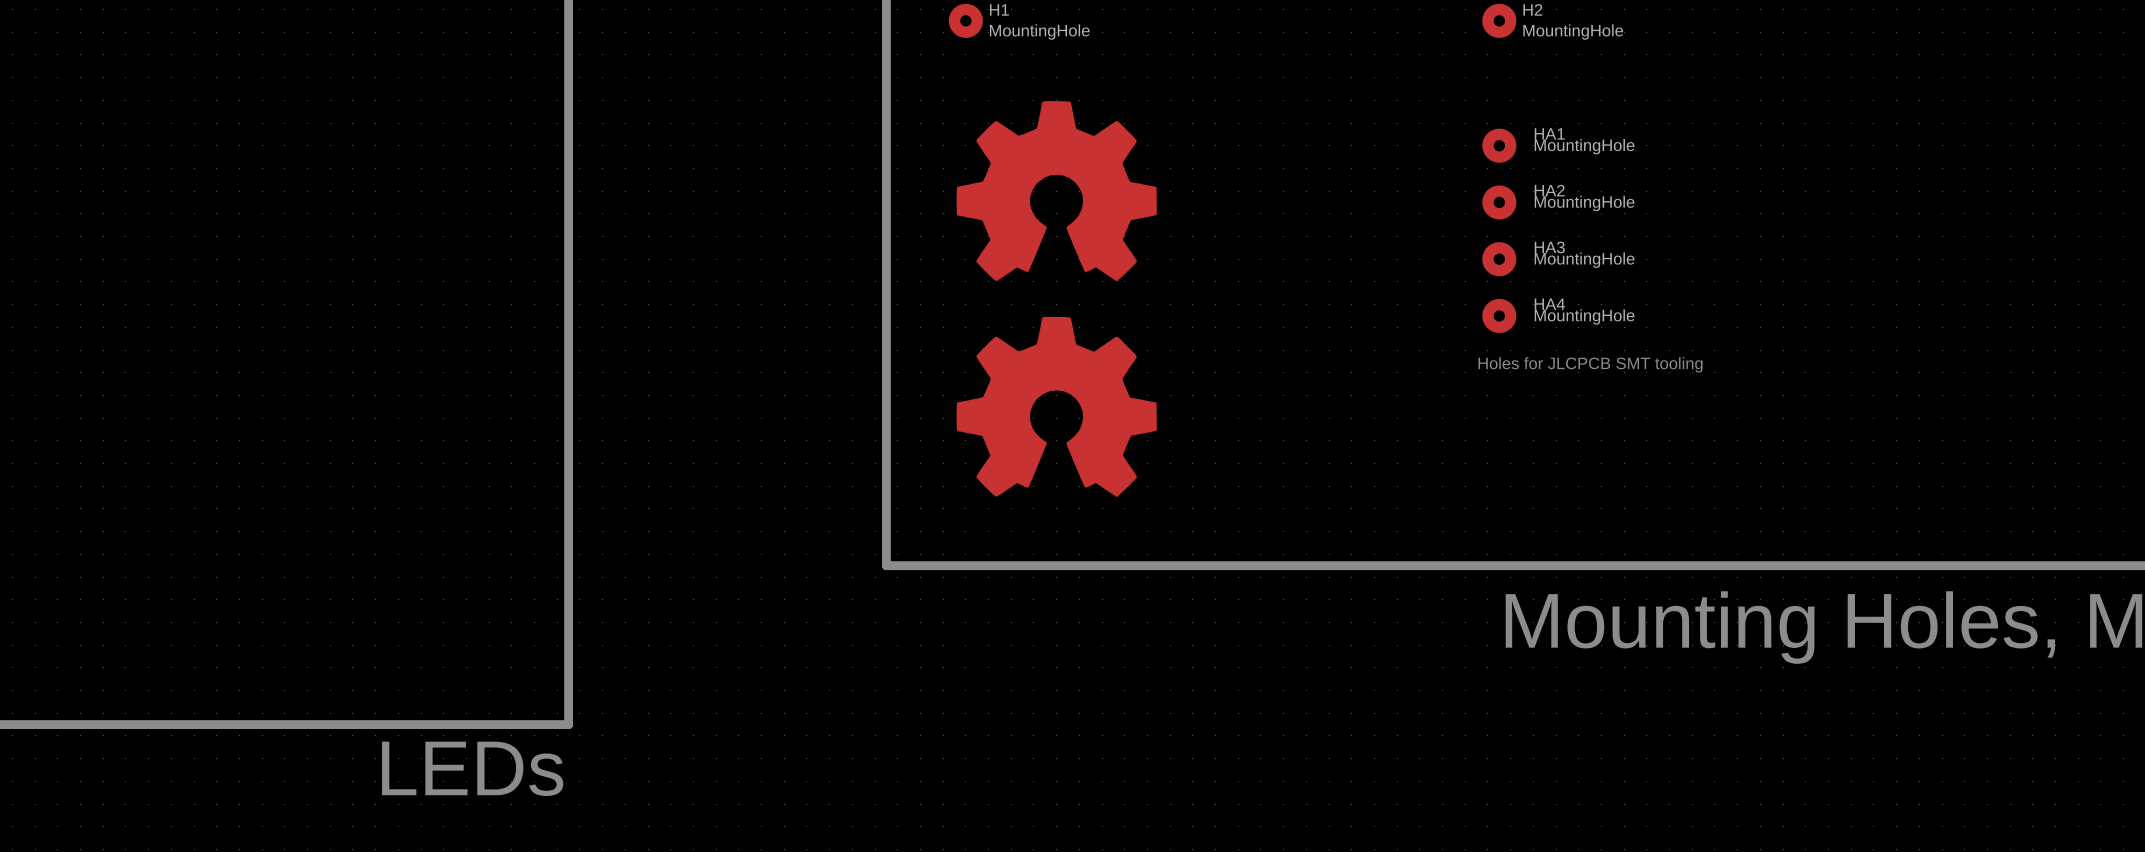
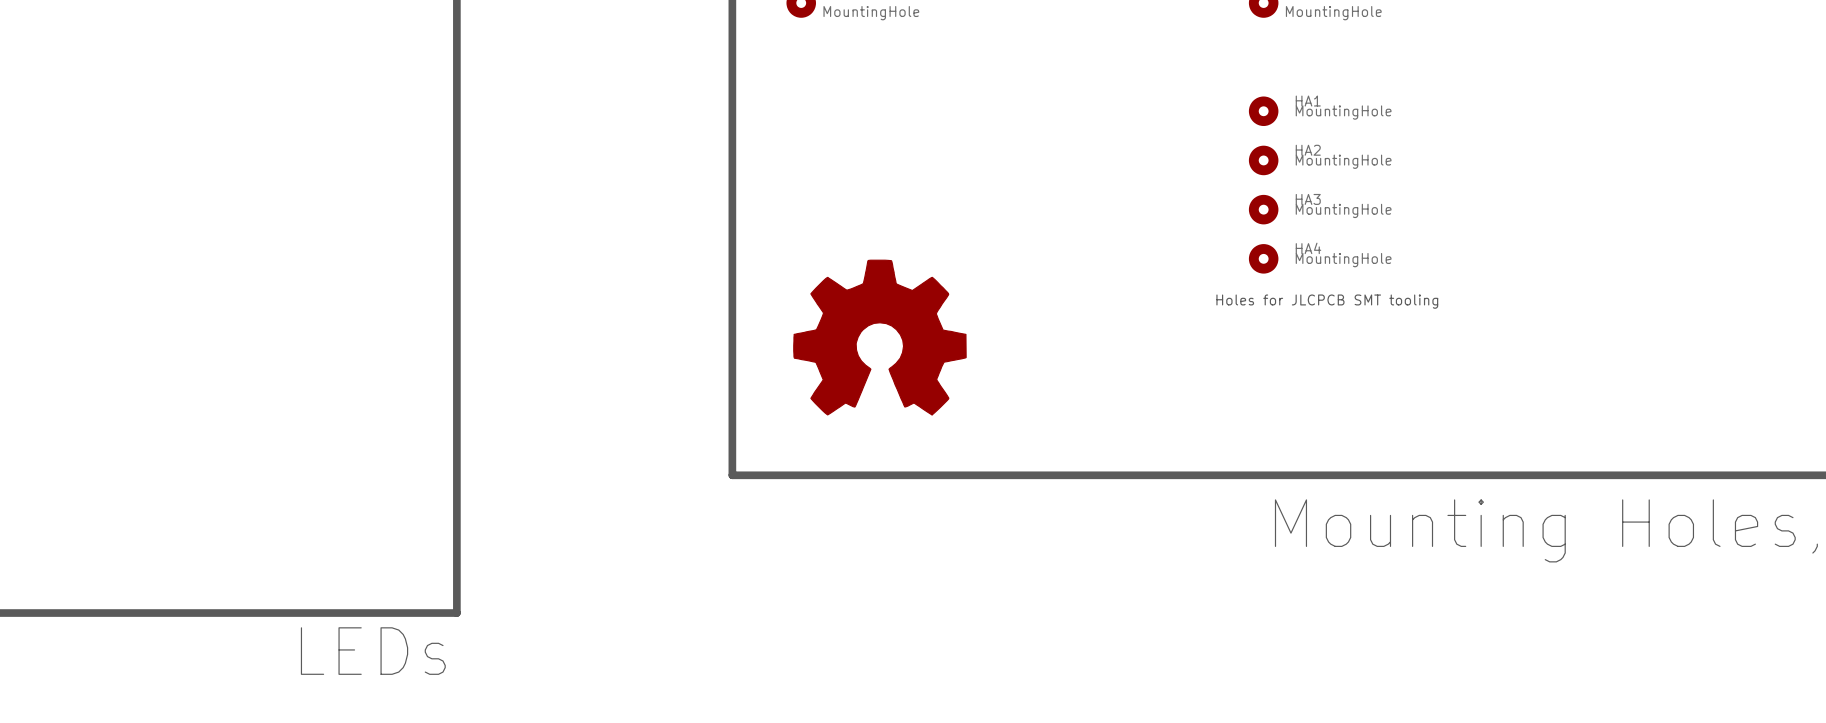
part: (1056, 191) -> none

